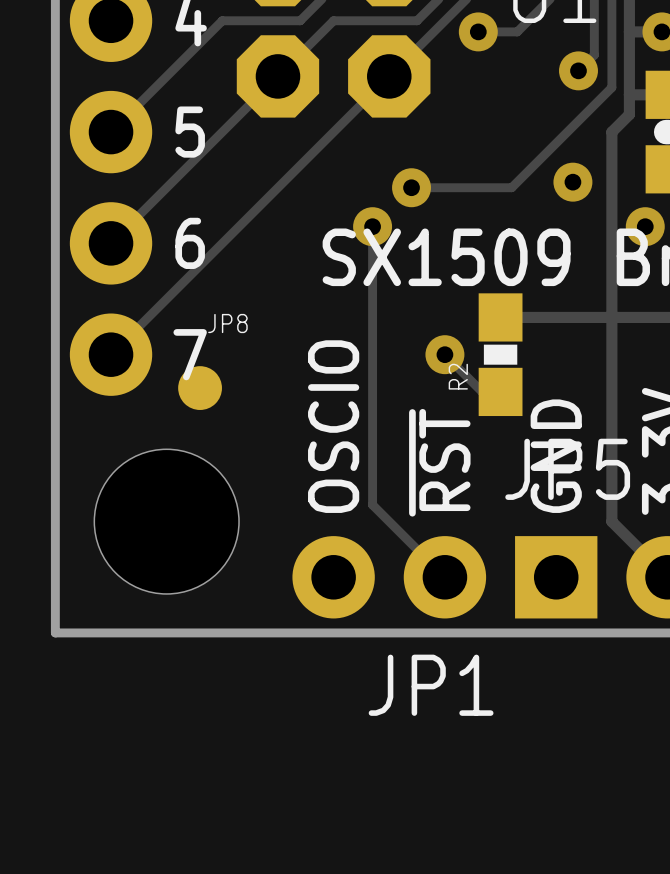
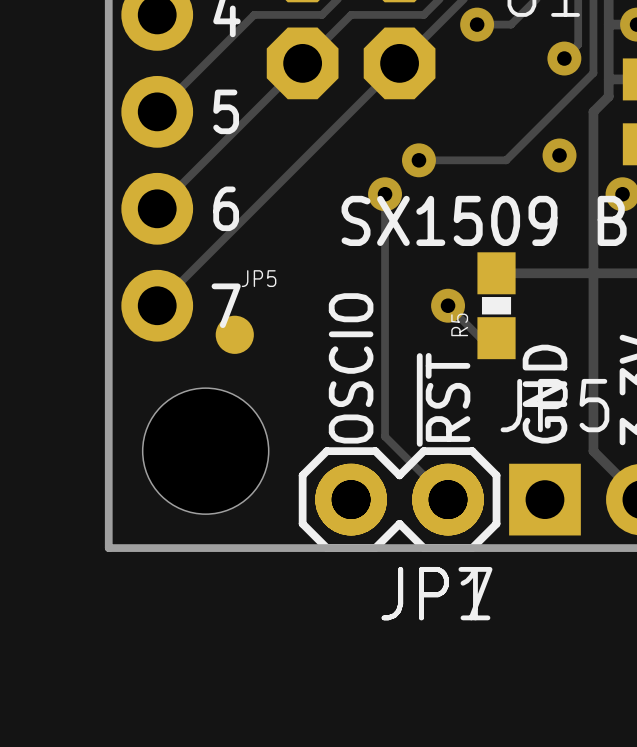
JP8 name: JP8 (227, 323) -> JP5 (259, 278)
R2 name: R2 (458, 376) -> R5 (459, 324)
part: none -> (399, 499)

